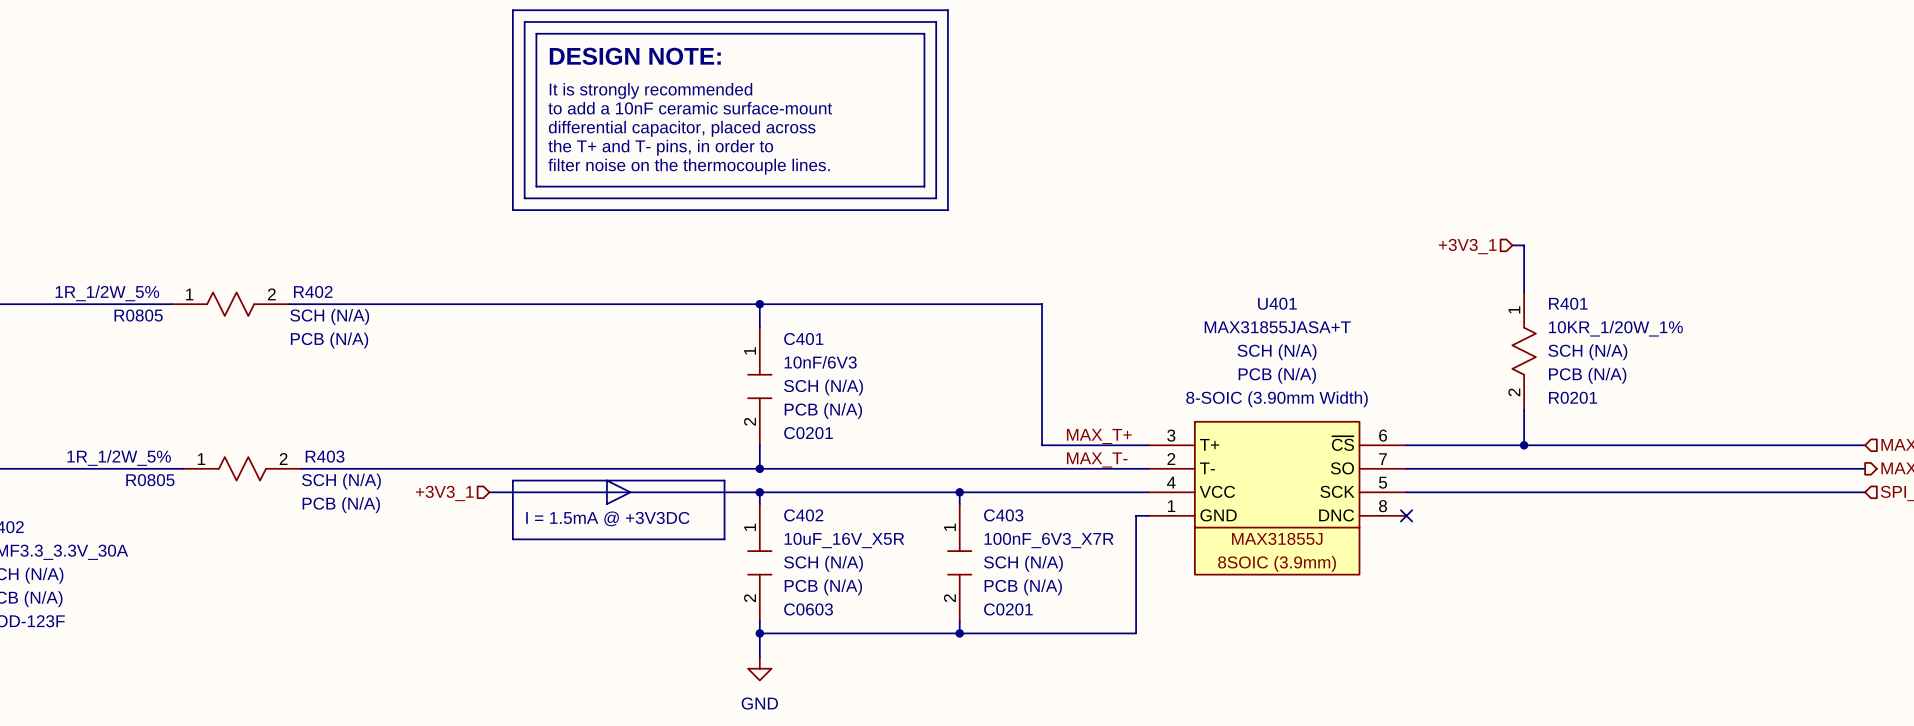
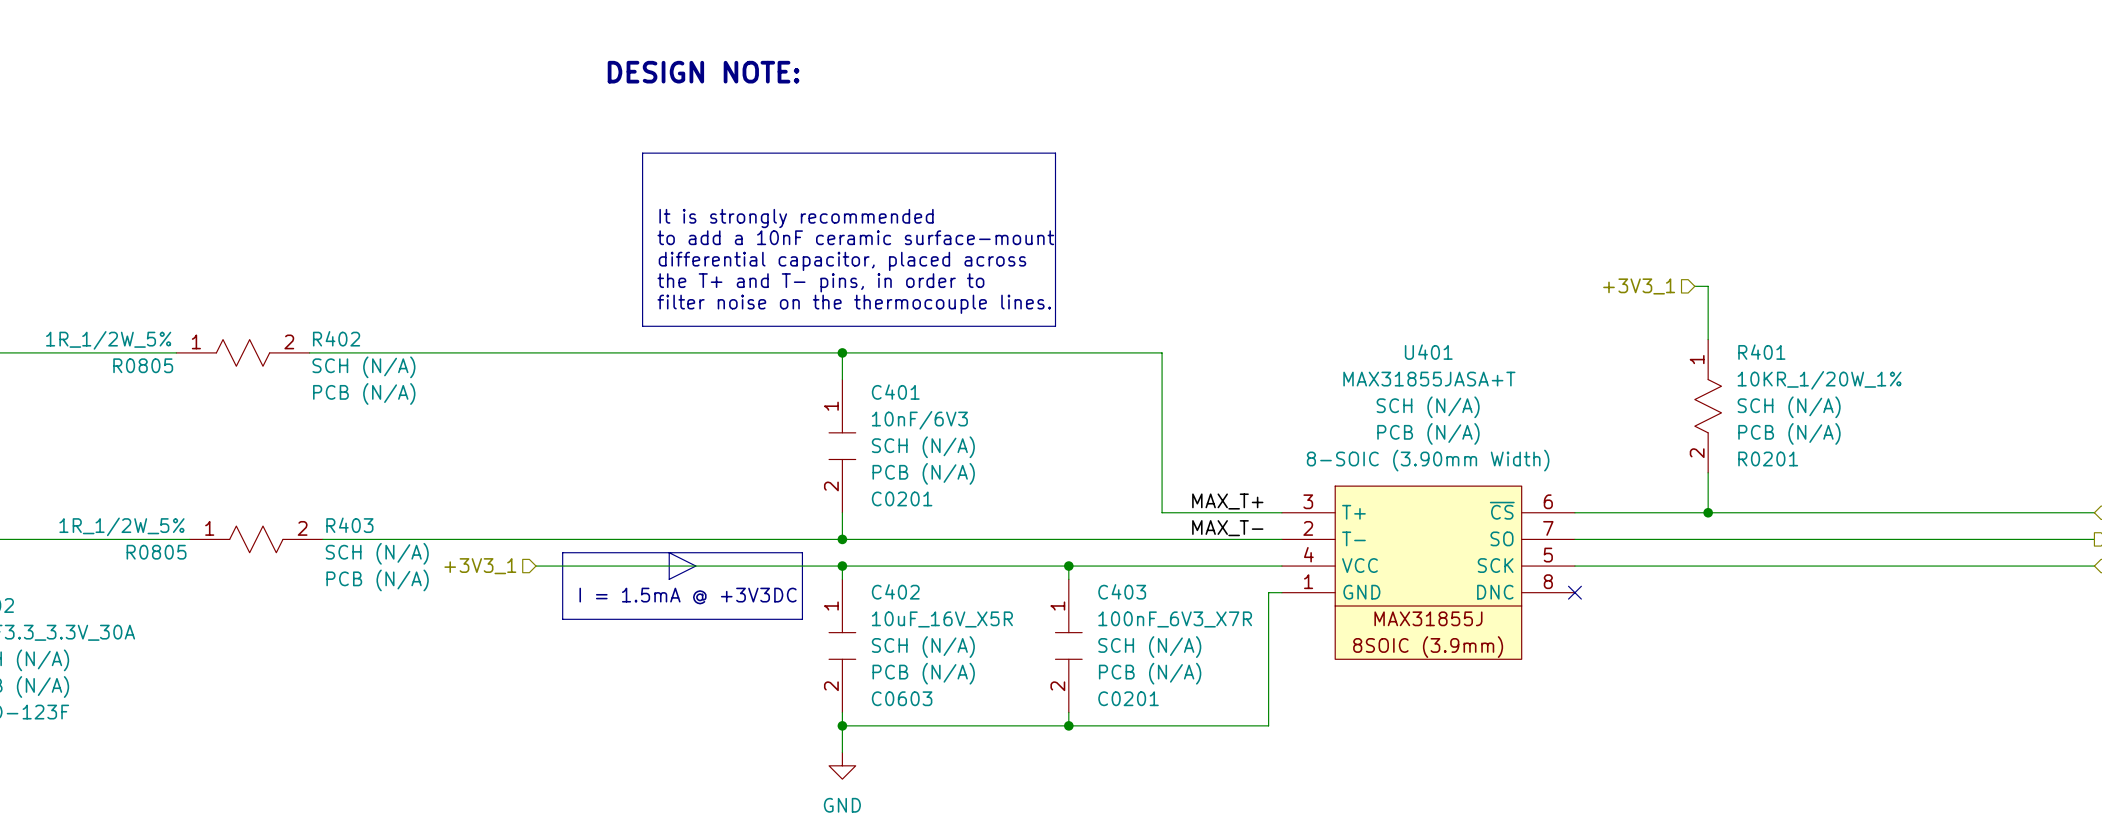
line: (524, 21) (524, 198) (936, 198) (936, 21) (524, 21) -> none
line: (536, 33) (924, 33) (924, 186) (536, 186) (536, 33) -> none
text position: It is strongly recommended (650, 90) -> It is strongly recommended (796, 218)
text position: to add a 10nF ceramic surface-mount (690, 108) -> to add a 10nF ceramic surface-mount (855, 237)
line: (947, 127) (947, 10) (512, 10) (512, 210) (947, 210) -> (1055, 153) (642, 153) (642, 326) (1055, 326) (1055, 246)
text position: differential capacitor, placed across (682, 128) -> differential capacitor, placed across (842, 261)
text position: the T+ and T- pins, in order to (660, 147) -> the T+ and T- pins, in order to (820, 282)
text position: filter noise on the thermocouple lines. (689, 166) -> filter noise on the thermocouple lines. (854, 304)

